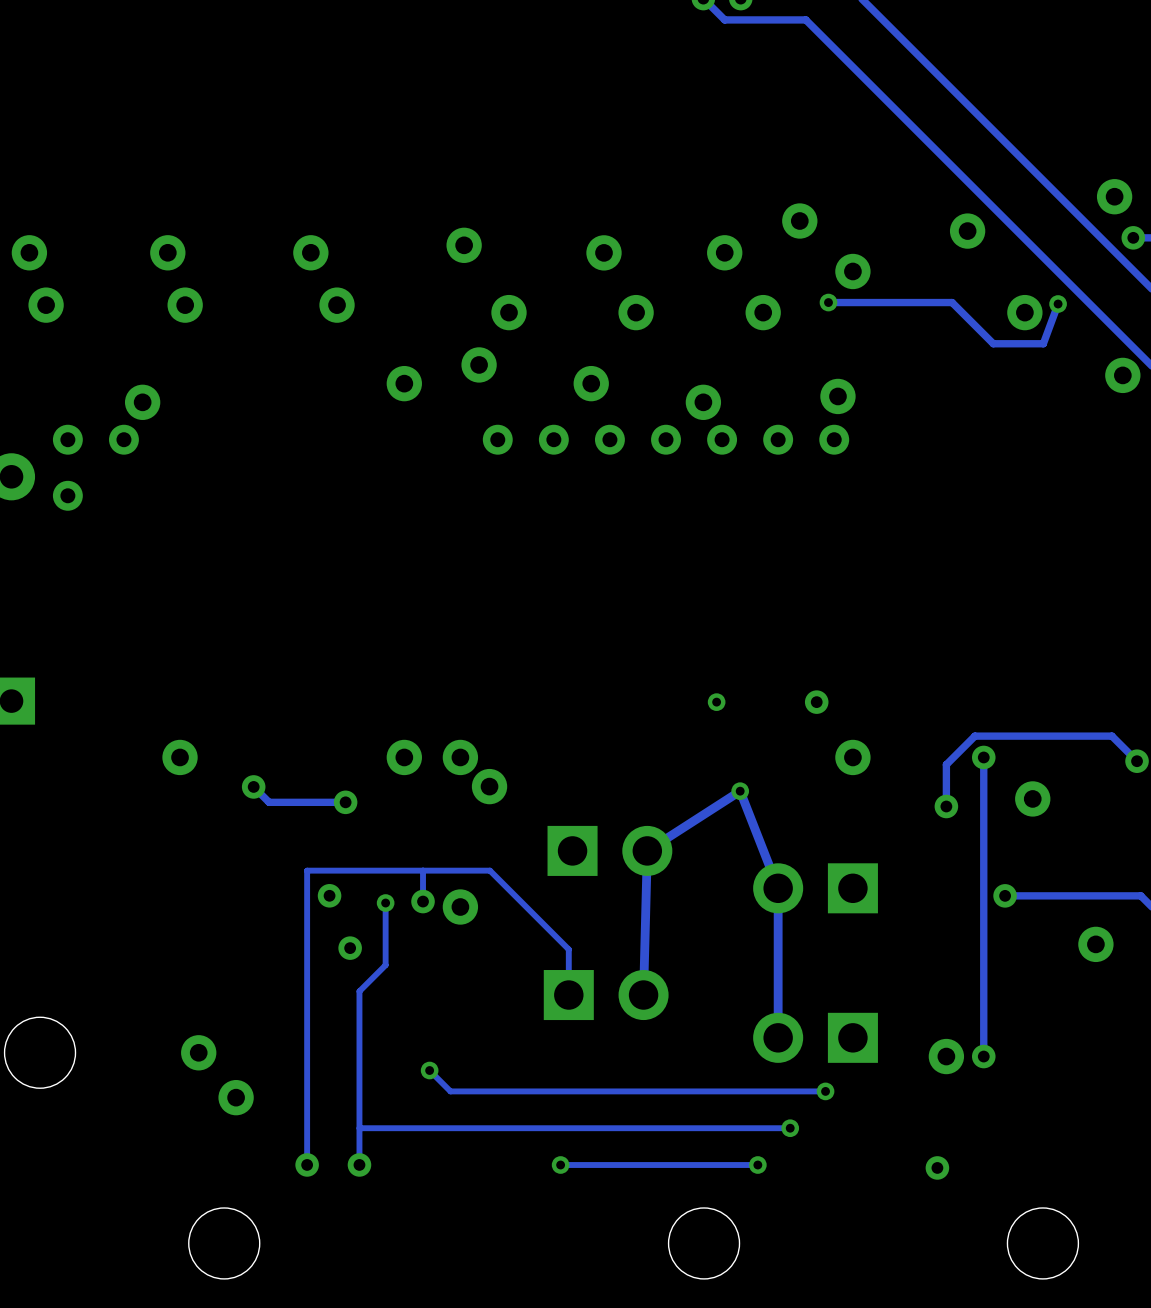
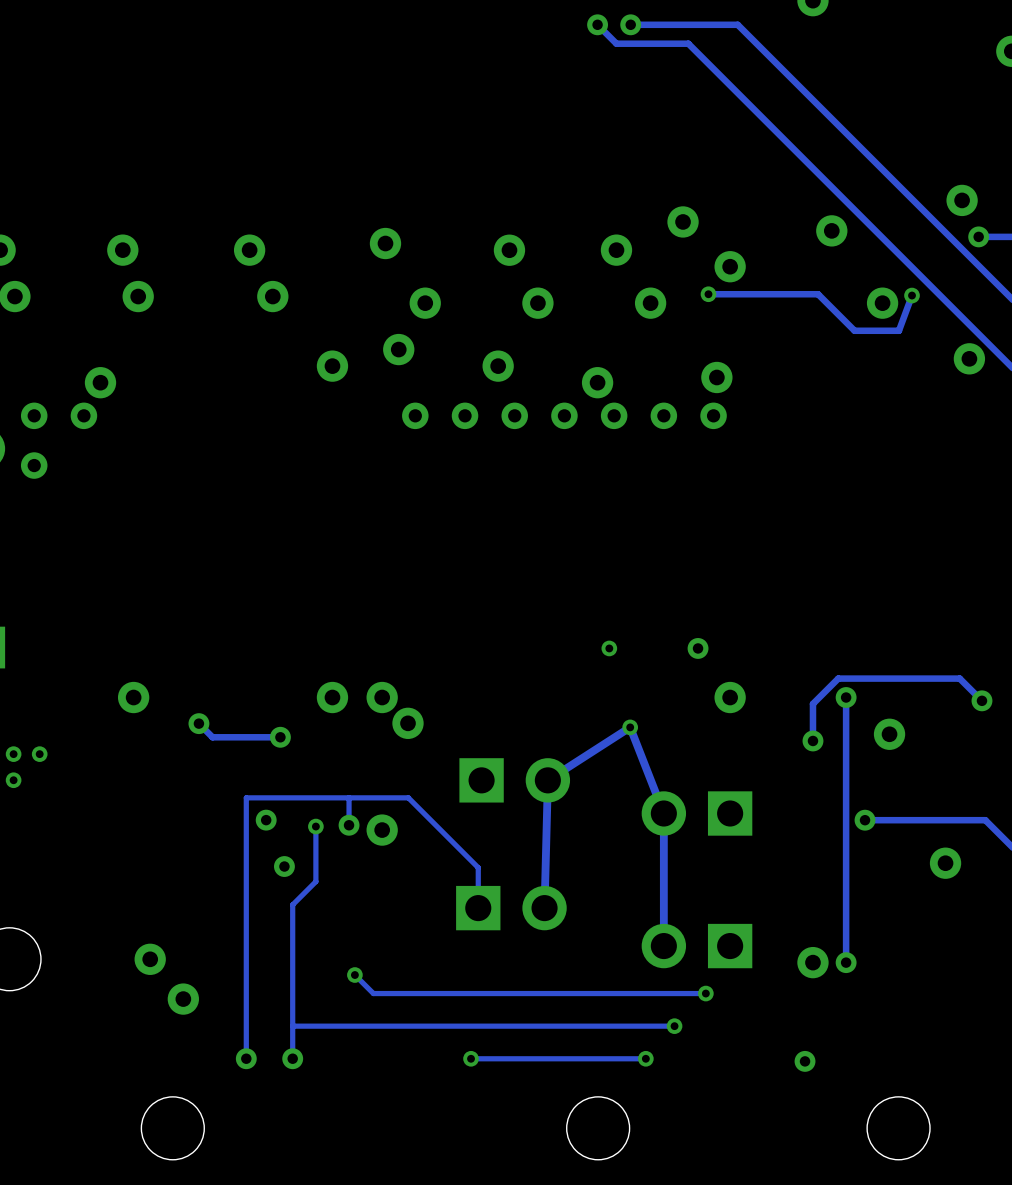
via: none -> (13, 754)
via: none -> (39, 754)
via: none -> (13, 780)

